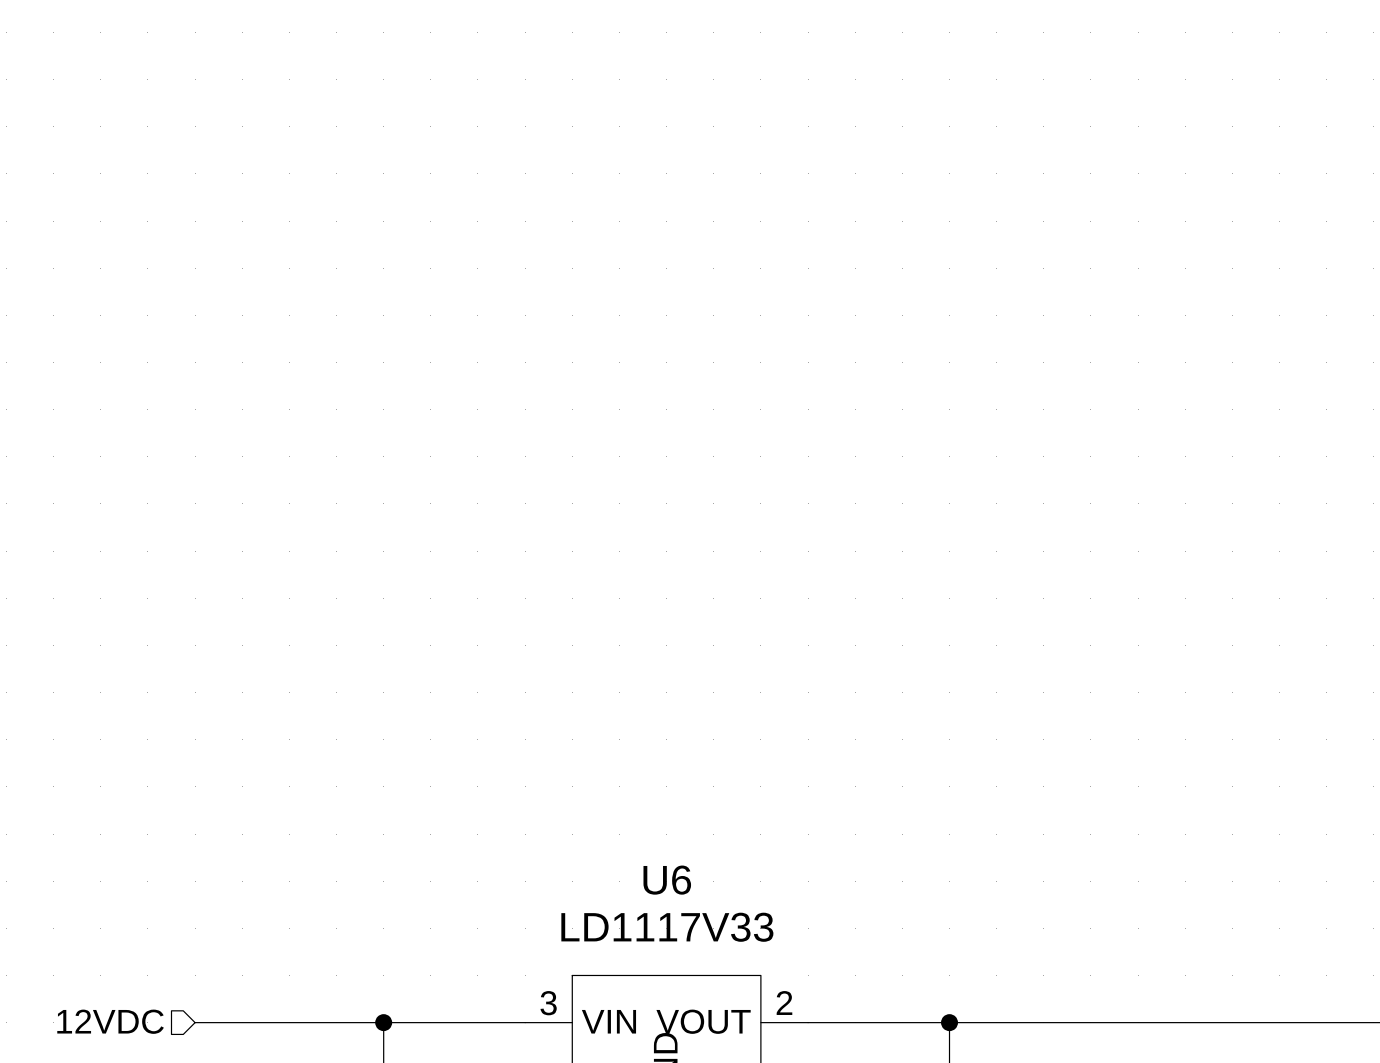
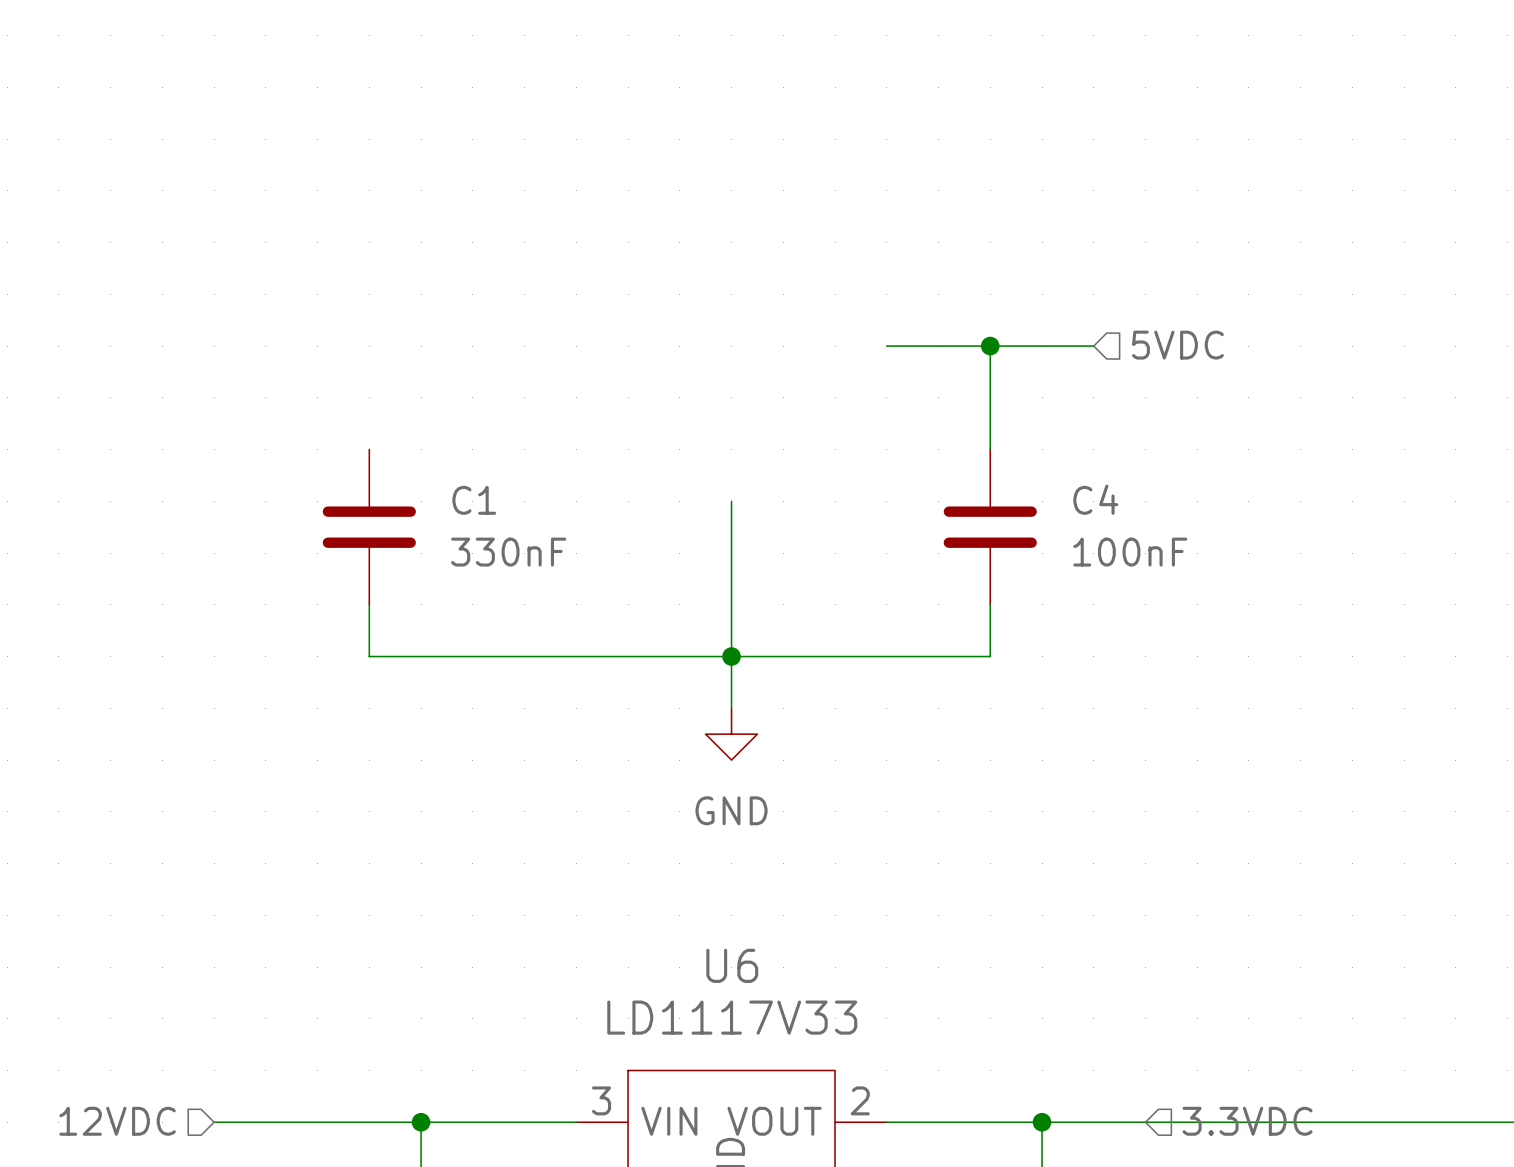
hierarchical label: none -> 5VDC (1177, 345)
wire: none -> (886, 346) (1093, 346)
wire: none -> (990, 346) (990, 449)
junction: none -> (990, 346)
wire: none -> (731, 501) (731, 708)
C1: none -> 330nF (369, 527)
C4: none -> 100nF (990, 527)
wire: none -> (369, 604) (369, 656) (990, 656) (990, 604)
junction: none -> (731, 656)
power symbol: none -> GND (731, 734)
hierarchical label: none -> 3.3VDC (1247, 1121)

